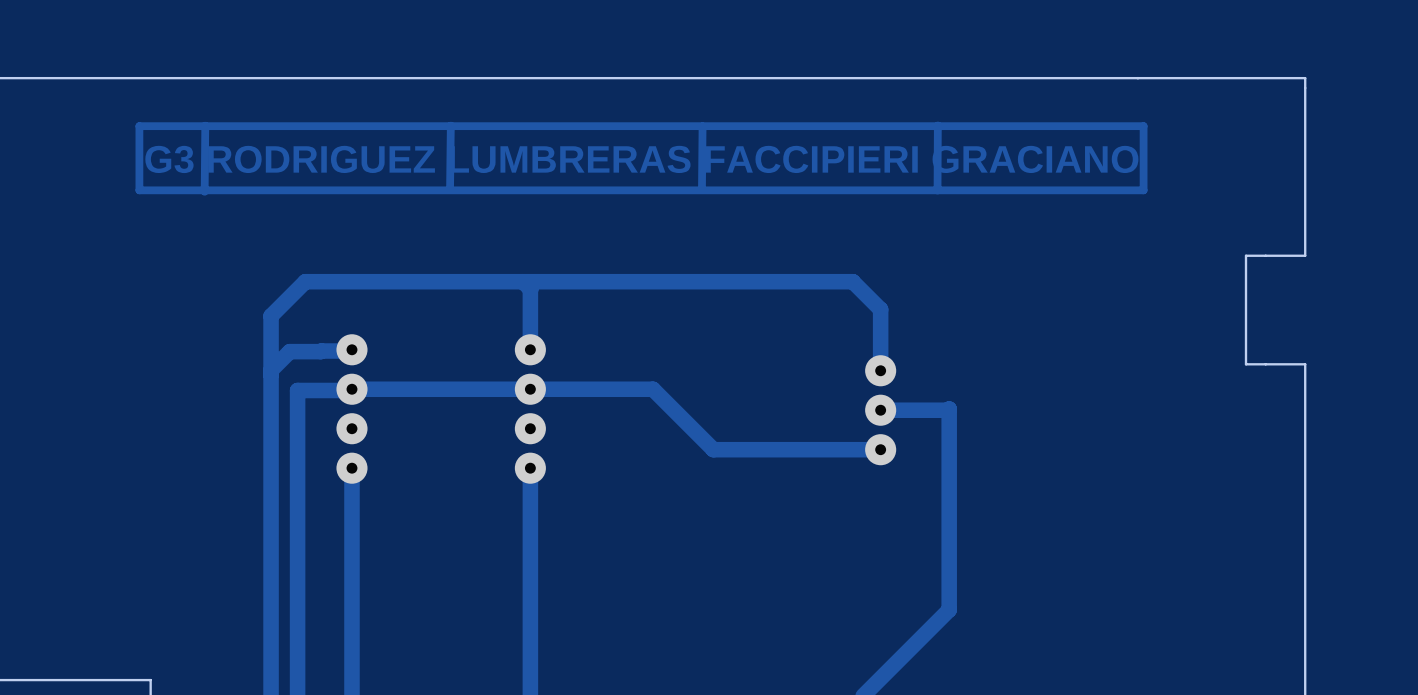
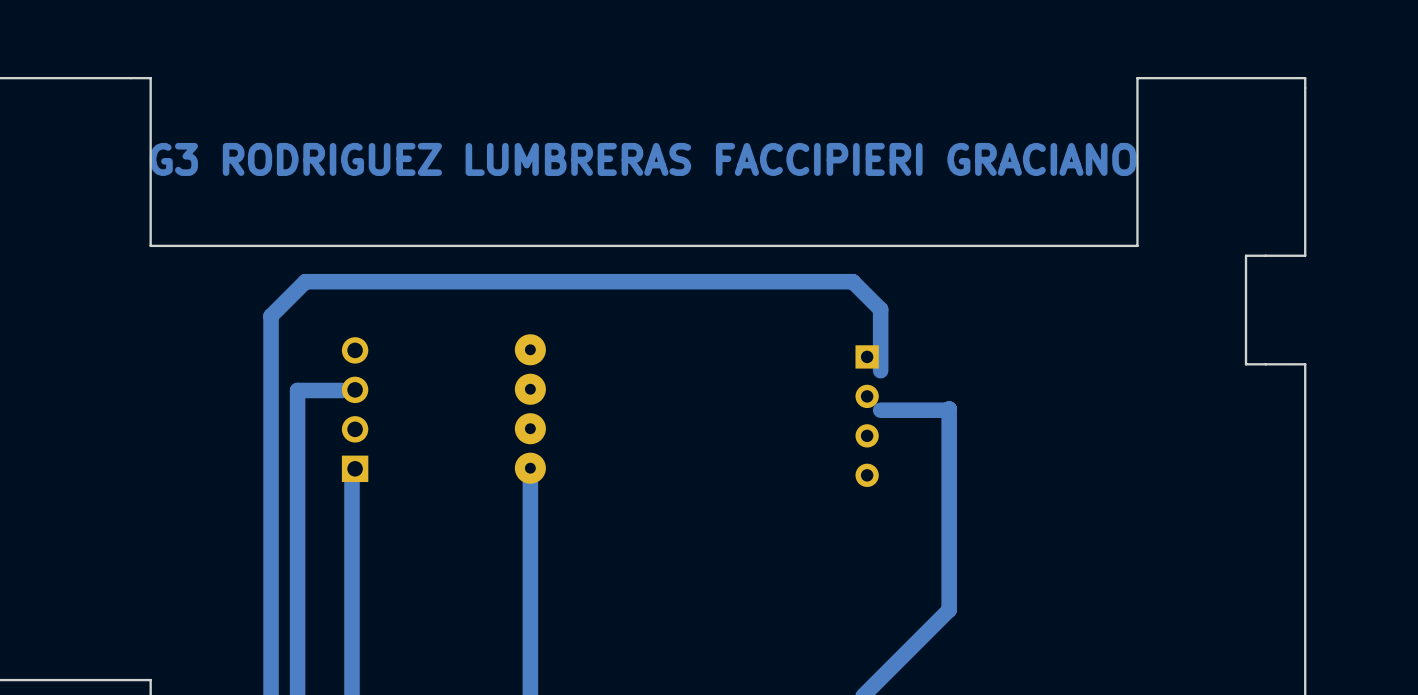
board edge: (1137, 78) (150, 78) -> (1137, 78) (1137, 245) (150, 245) (150, 78)
track: (205, 125) (204, 191) -> none
track: (450, 125) (450, 190) -> none
track: (937, 125) (937, 190) -> none
track: (702, 126) (701, 190) -> none
track: (1143, 126) (139, 126) (139, 190) (1143, 190) (1143, 126) -> none
track: (522, 281) (530, 289) (530, 348) -> none
part footprint: [336, 334, 368, 484] -> [341, 337, 369, 483]
track: (351, 351) (289, 351) (271, 370) -> none
part footprint: [865, 355, 897, 466] -> [855, 345, 879, 487]
track: (353, 389) (652, 389) (713, 449) (880, 449) -> none

